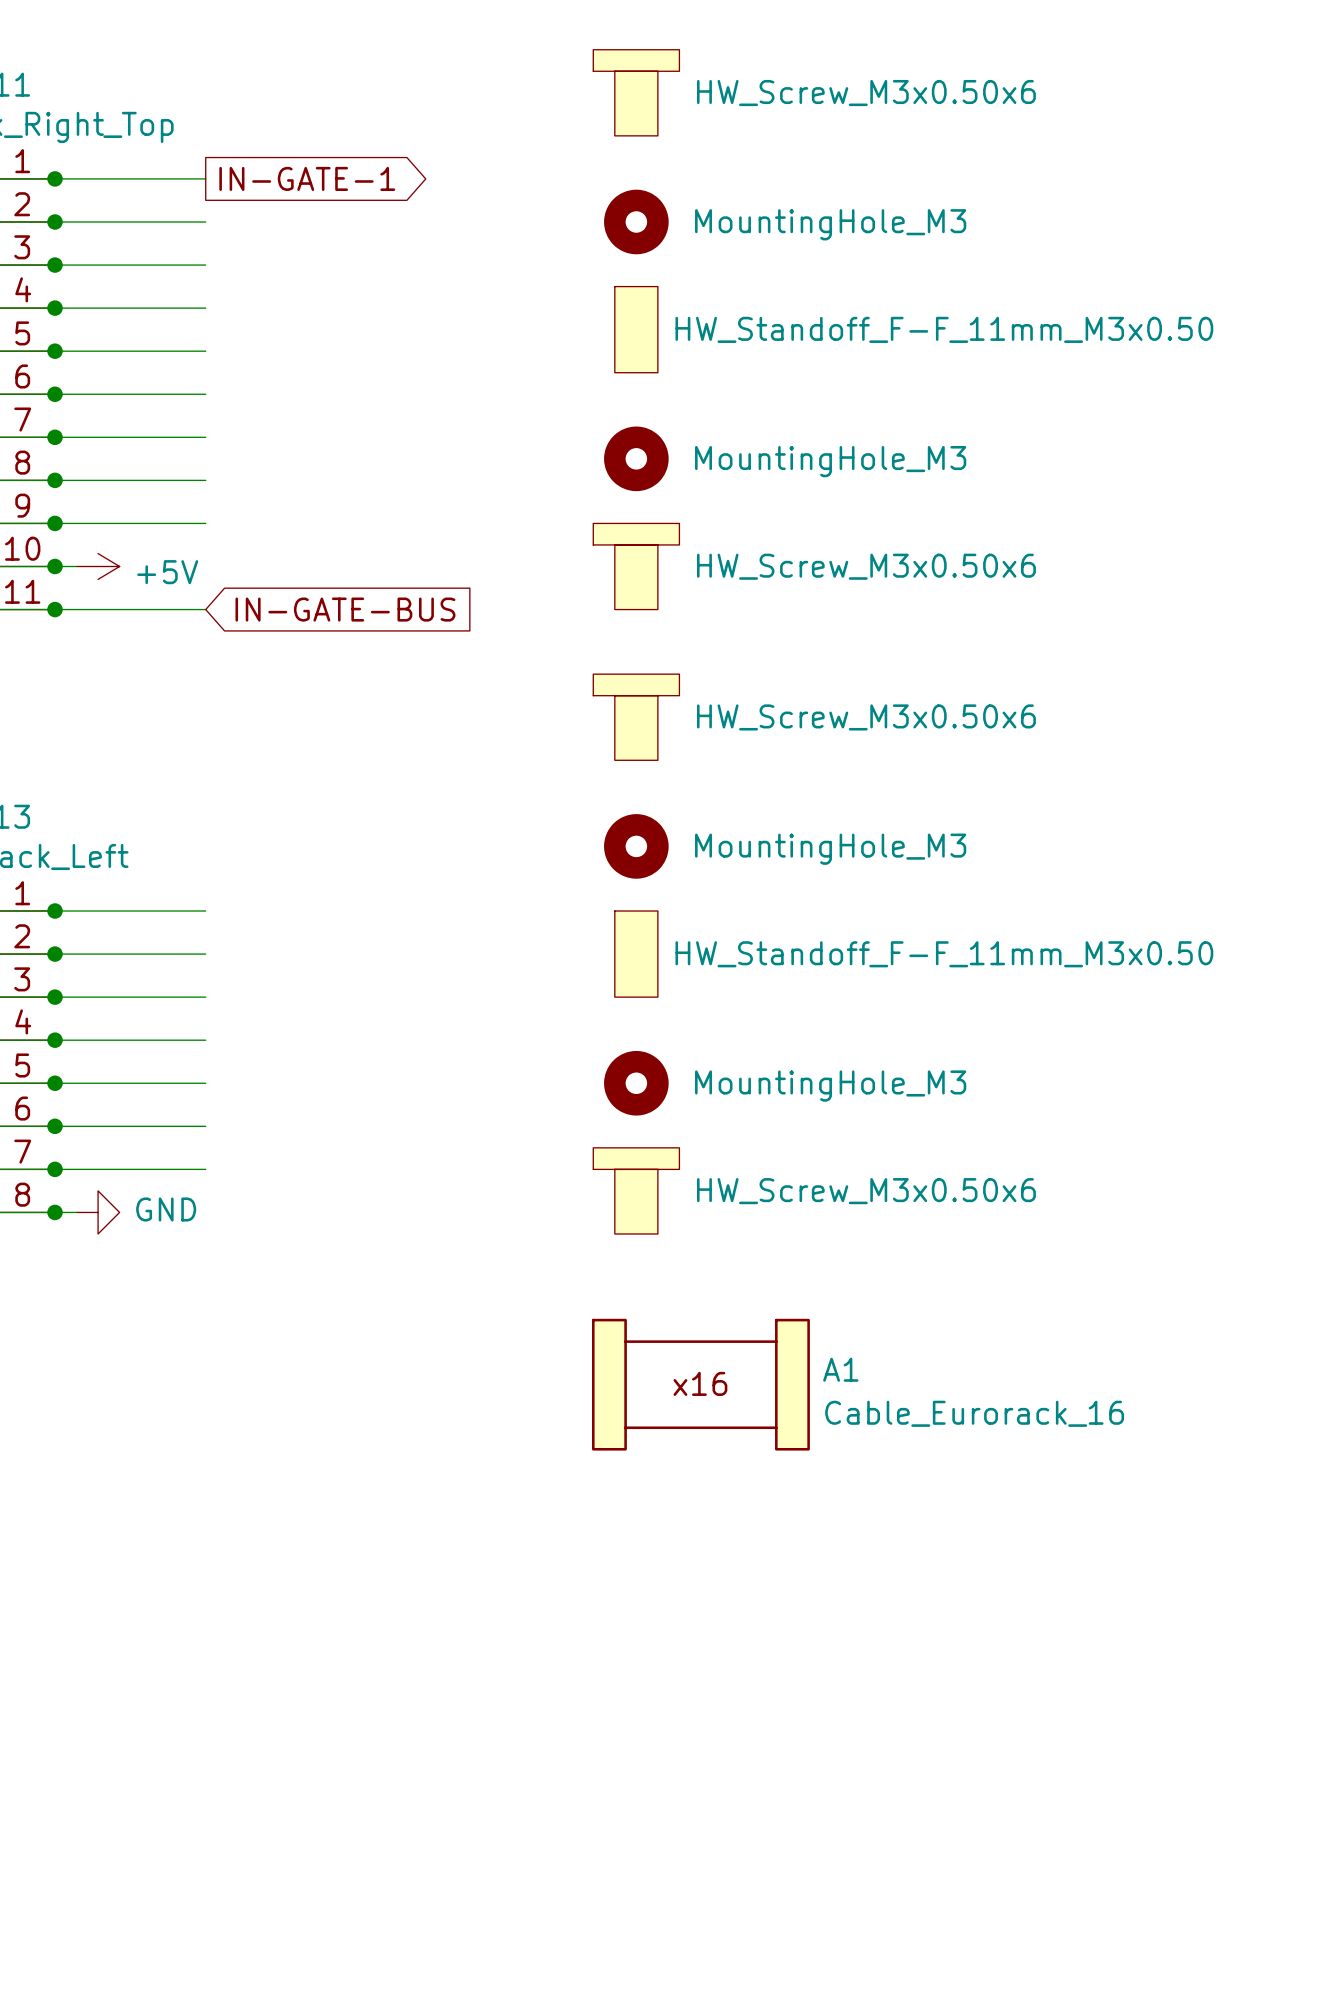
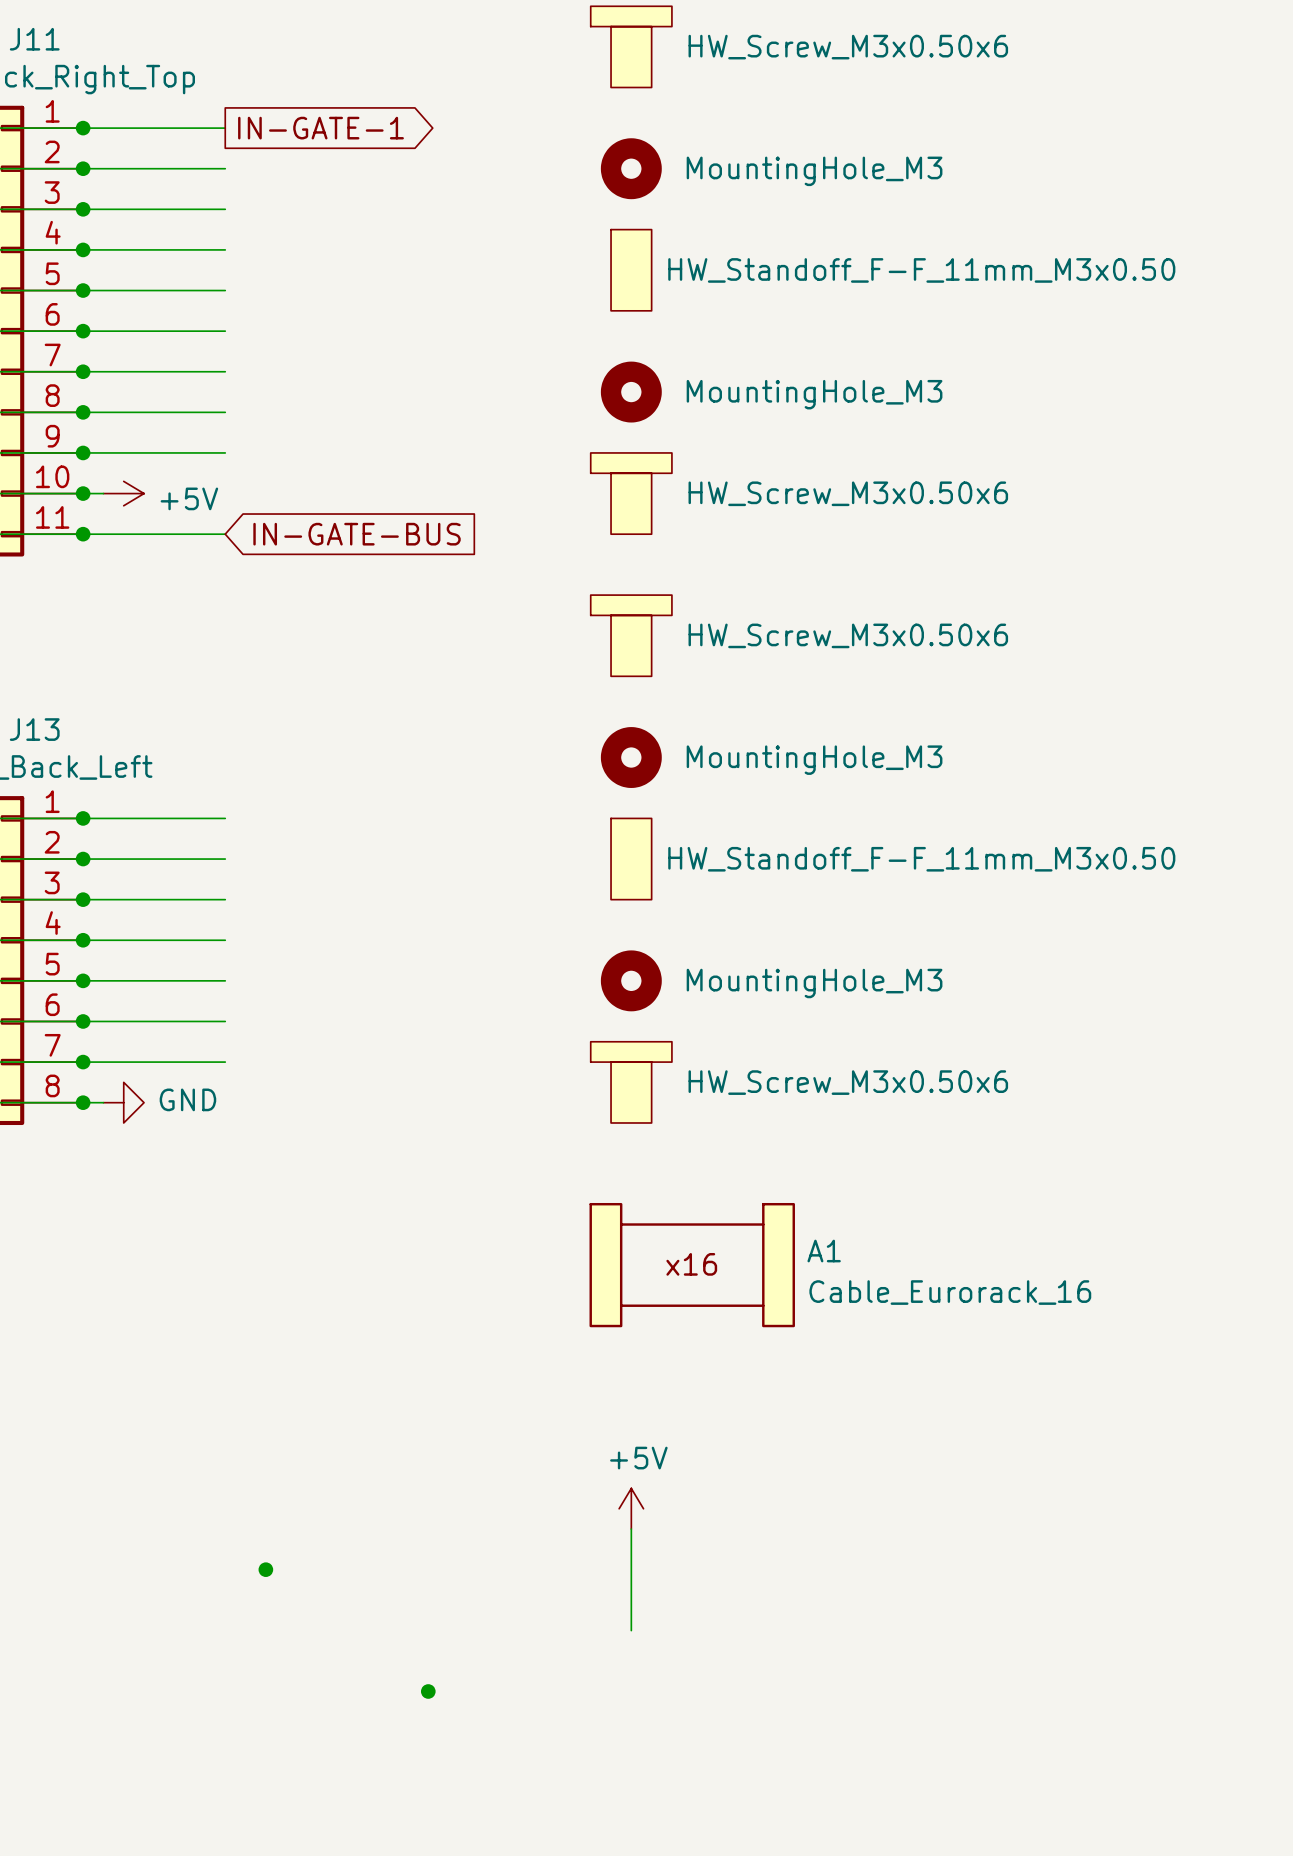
power symbol: none -> +5V (631, 1508)
wire: none -> (631, 1529) (631, 1630)
junction: none -> (265, 1569)
junction: none -> (428, 1691)

